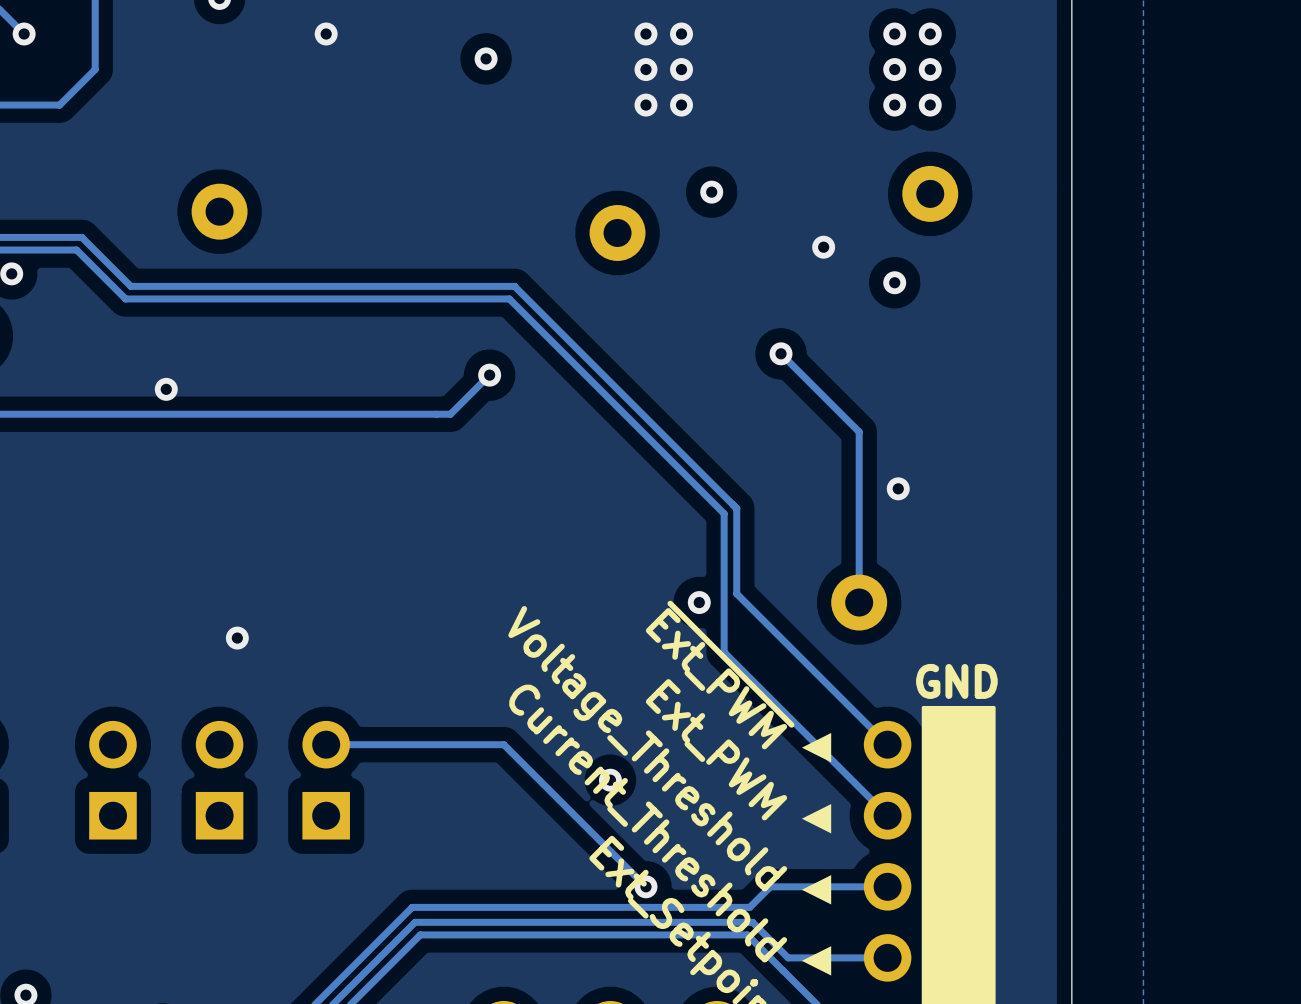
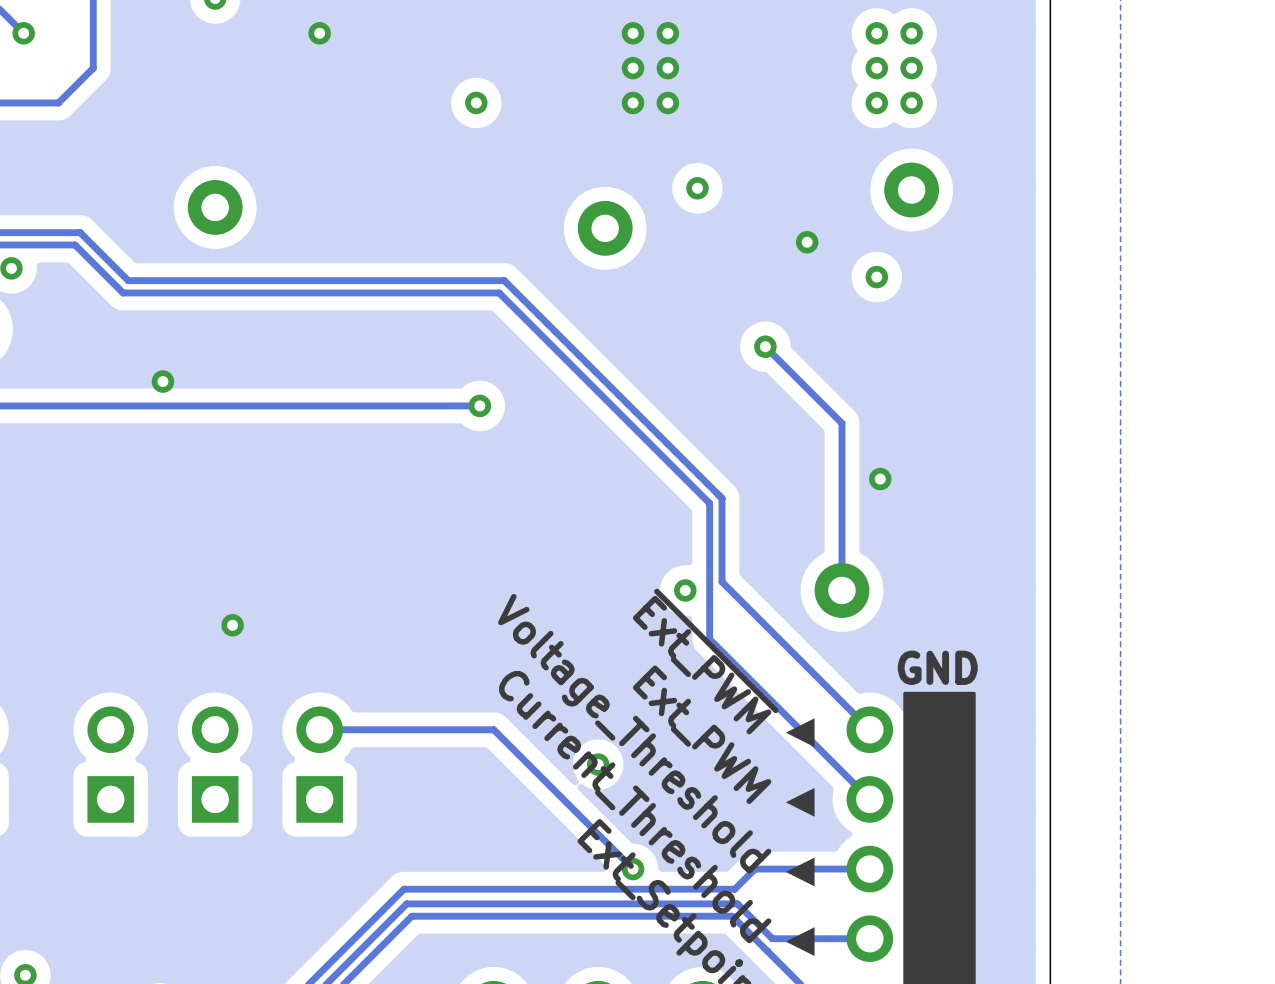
via position: (486, 58) -> (476, 102)
track: (489, 375) (450, 414) -> (479, 405) (441, 405)
via position: (489, 375) -> (479, 405)

